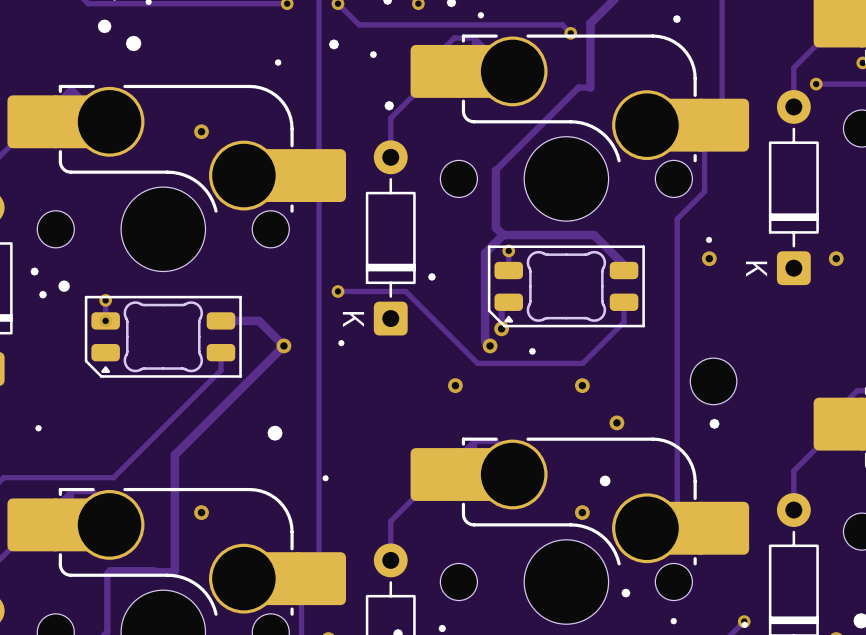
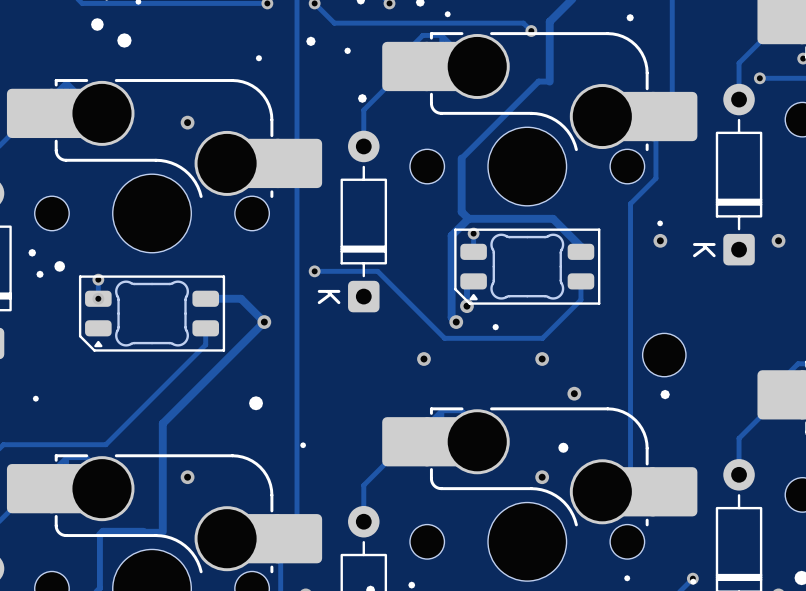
drawing: [428, 273, 436, 281] -> none
drawing: [338, 339, 345, 347] -> none
drawing: [621, 588, 631, 598] -> none

